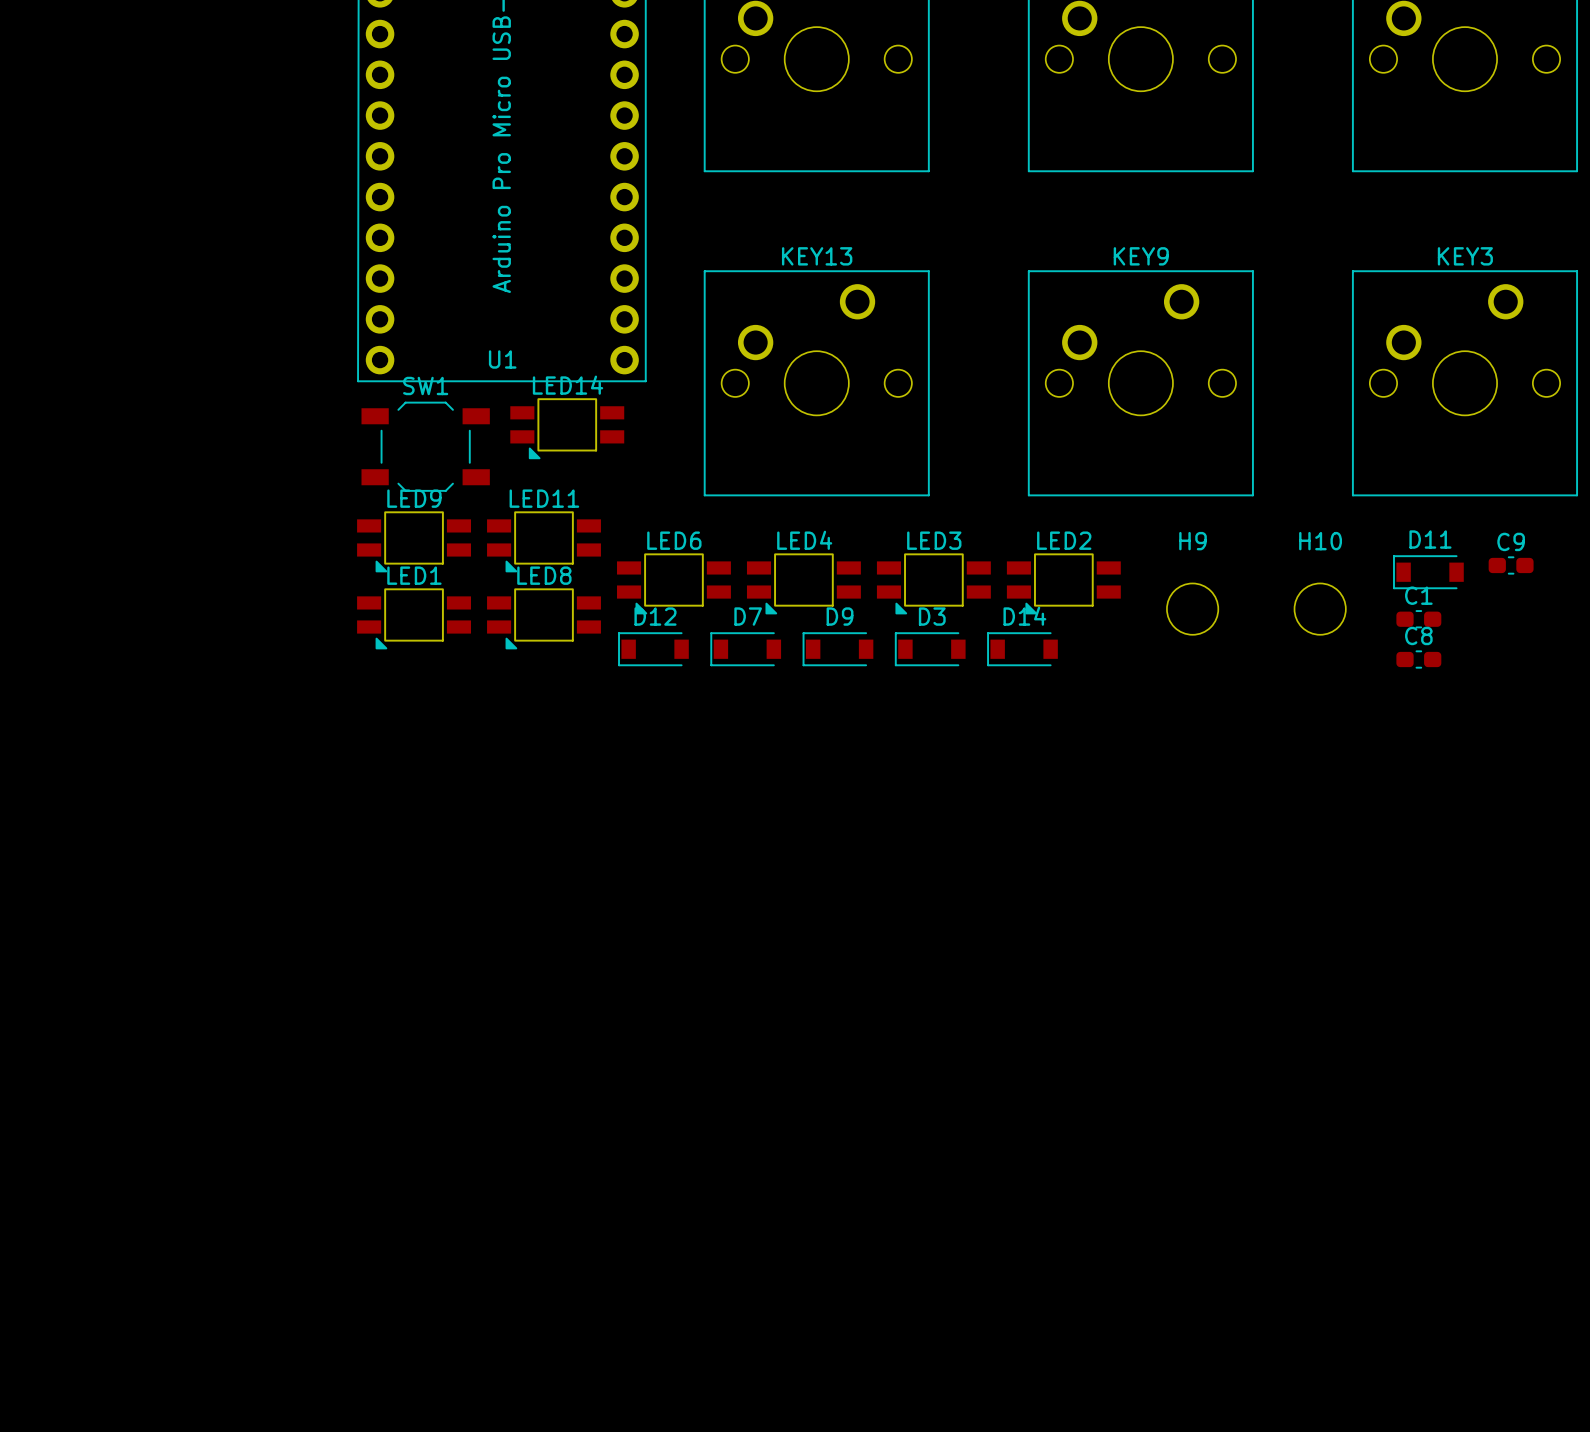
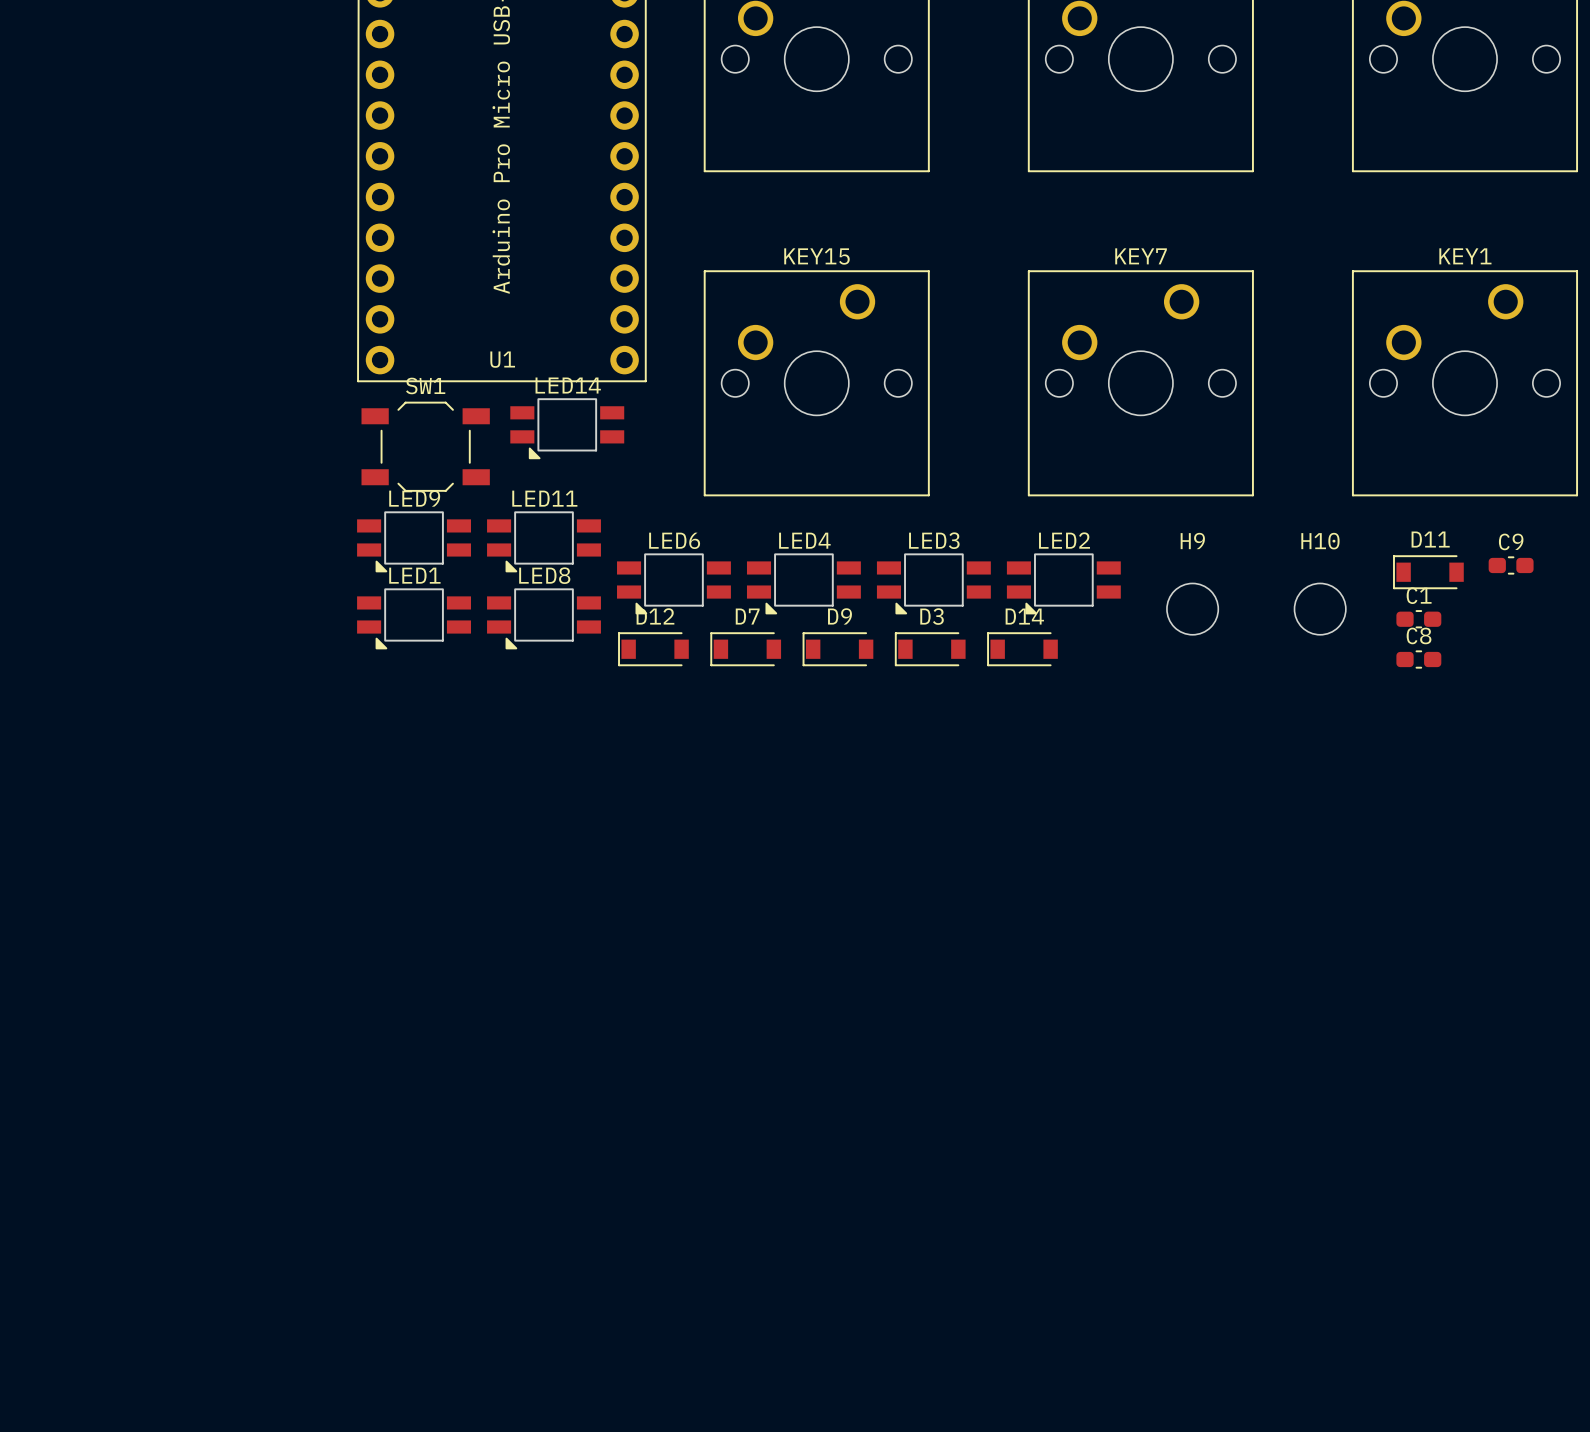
KEY13 name: KEY13 (817, 256) -> KEY15 (816, 256)
KEY9 name: KEY9 (1141, 256) -> KEY7 (1141, 256)
KEY3 name: KEY3 (1465, 256) -> KEY1 (1465, 256)

